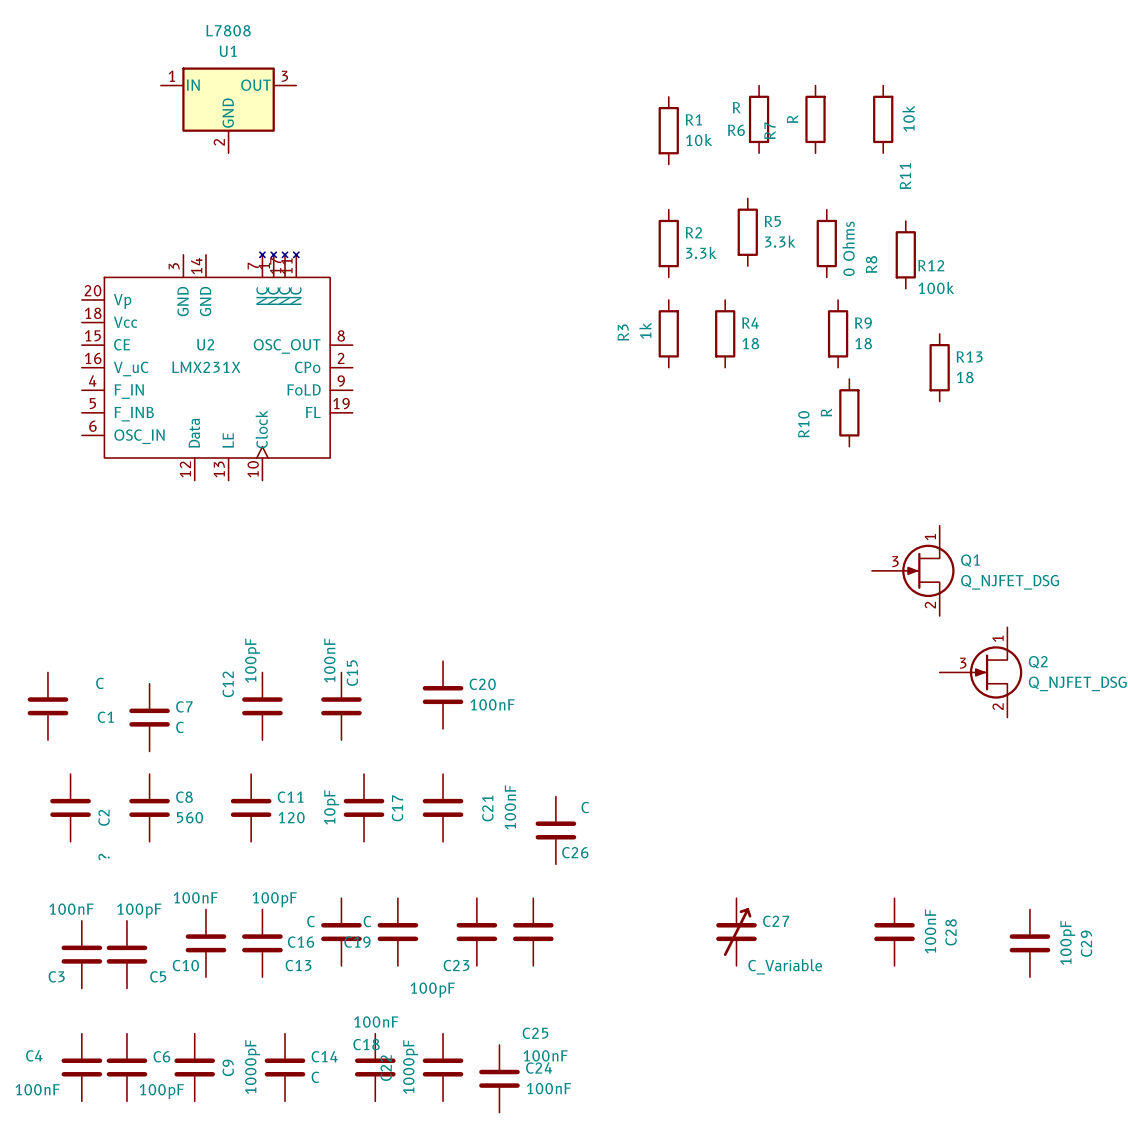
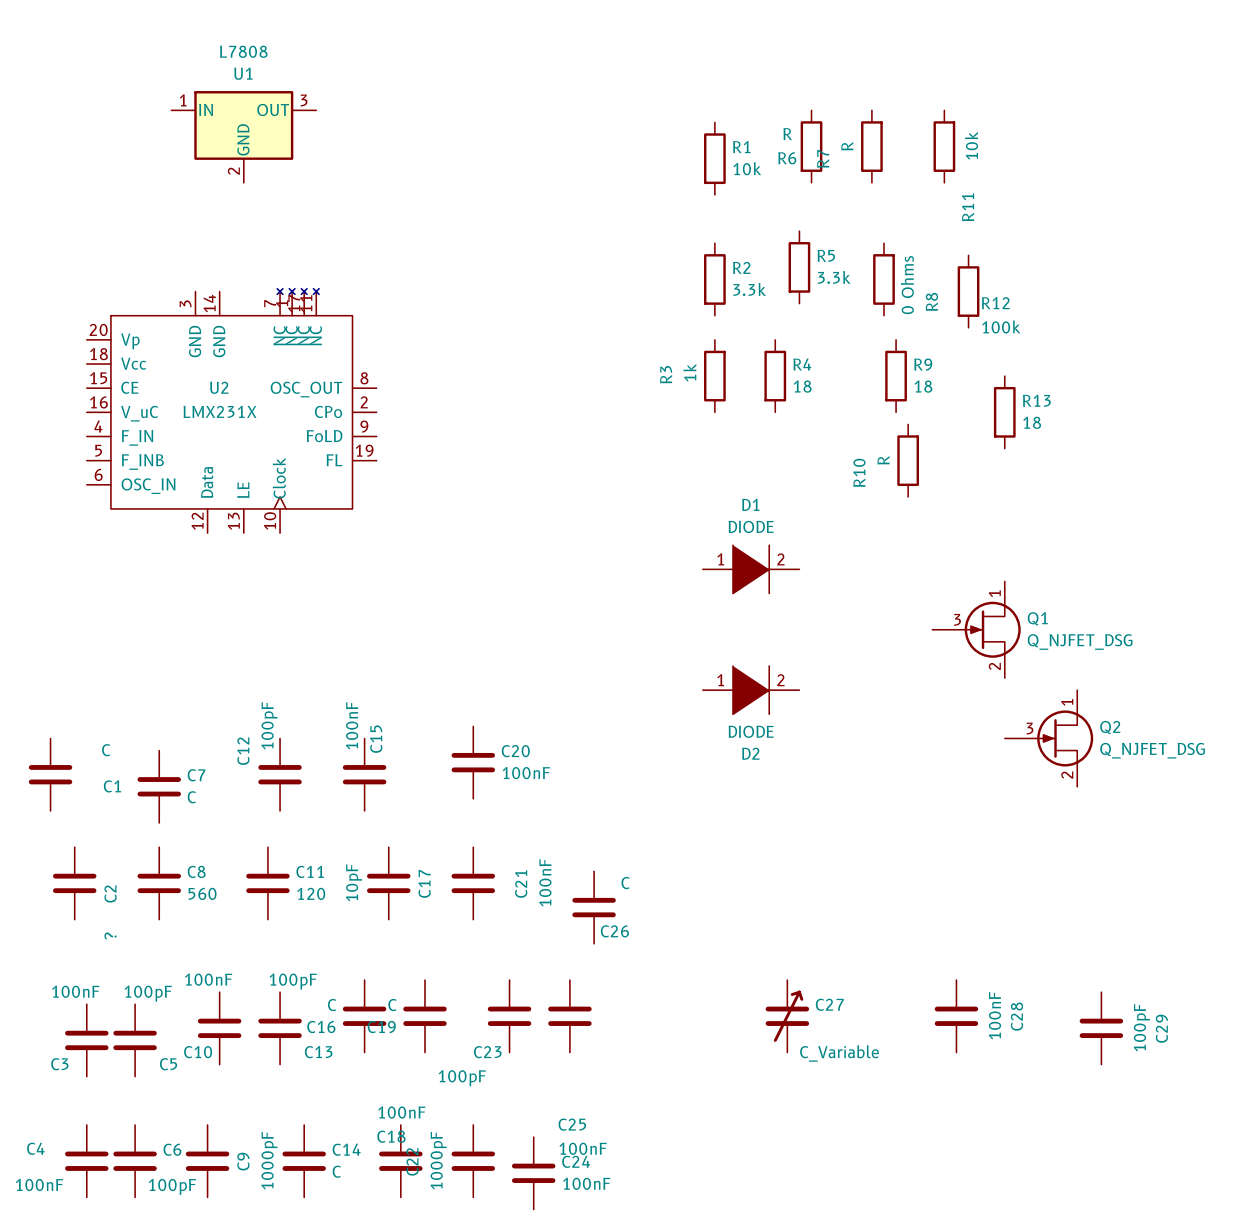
D1: none -> DIODE (751, 569)
D2: none -> DIODE (751, 690)

